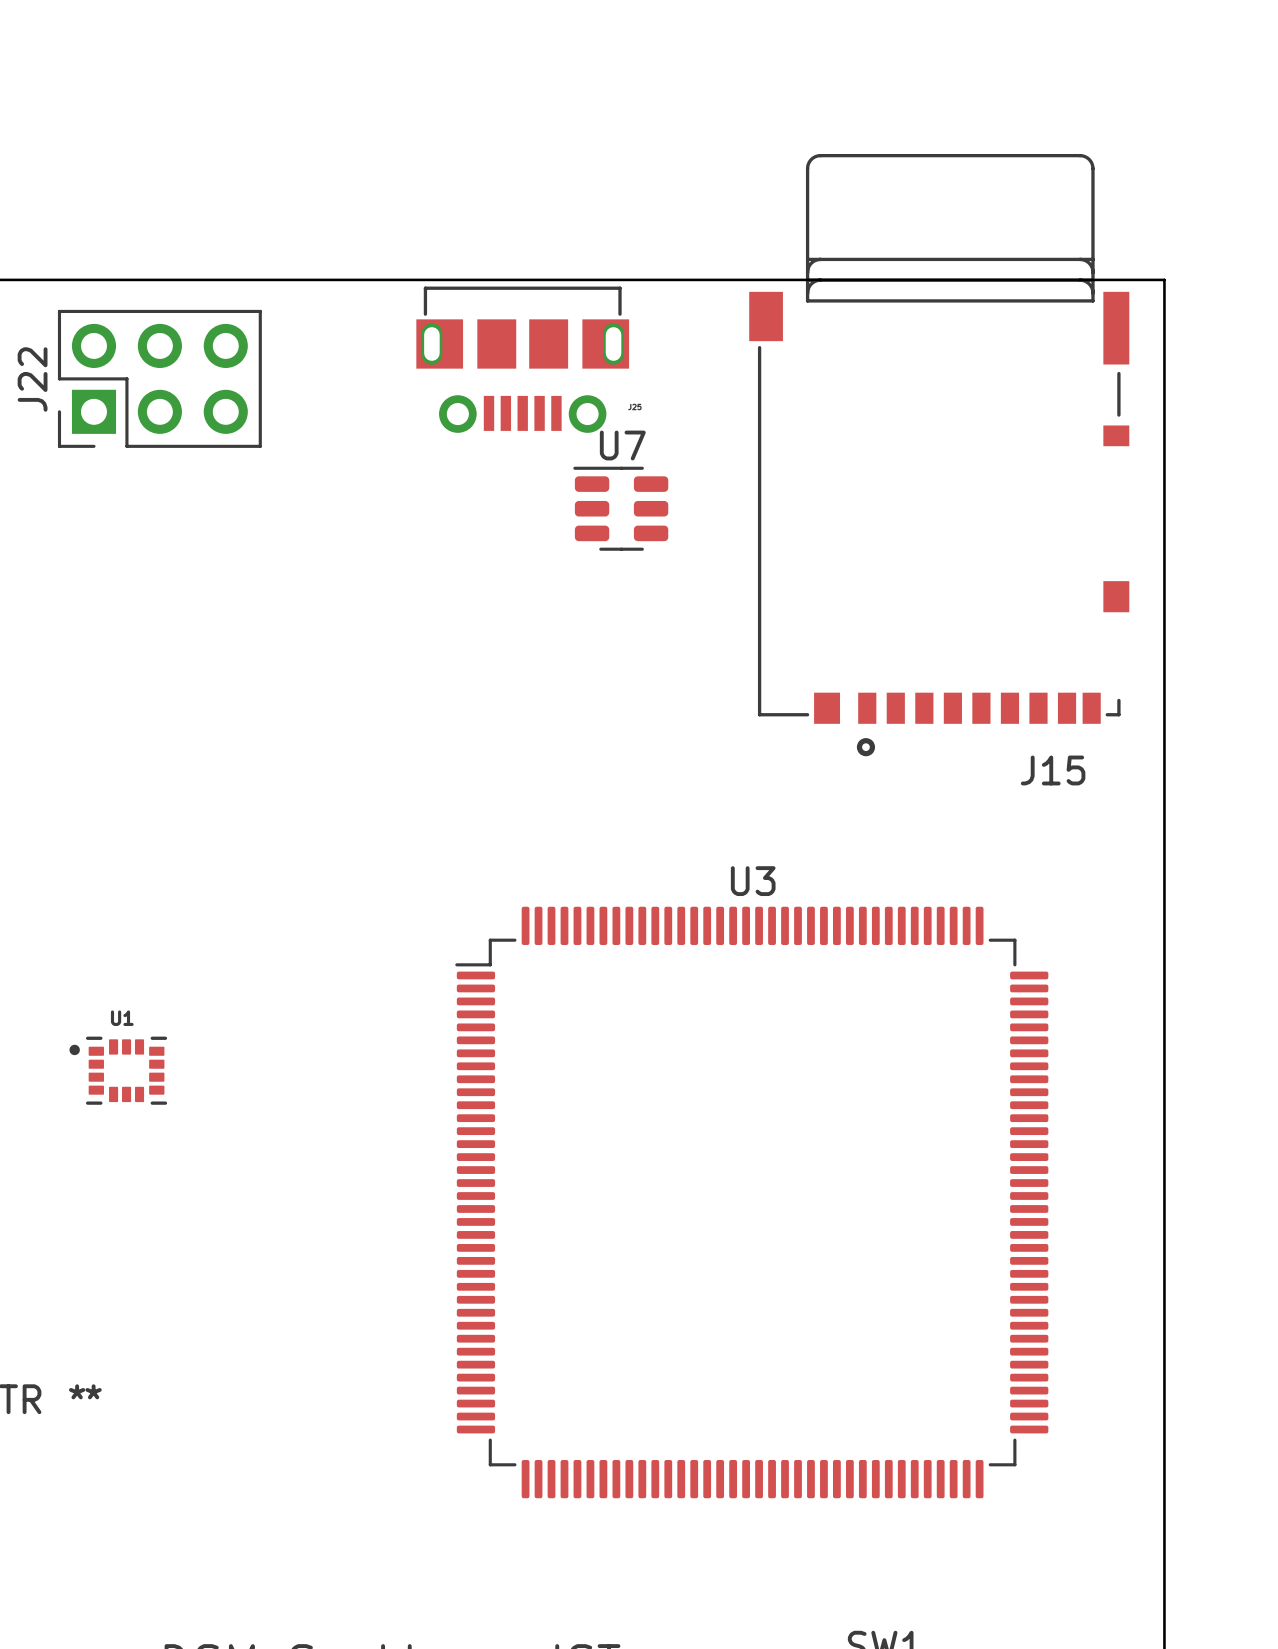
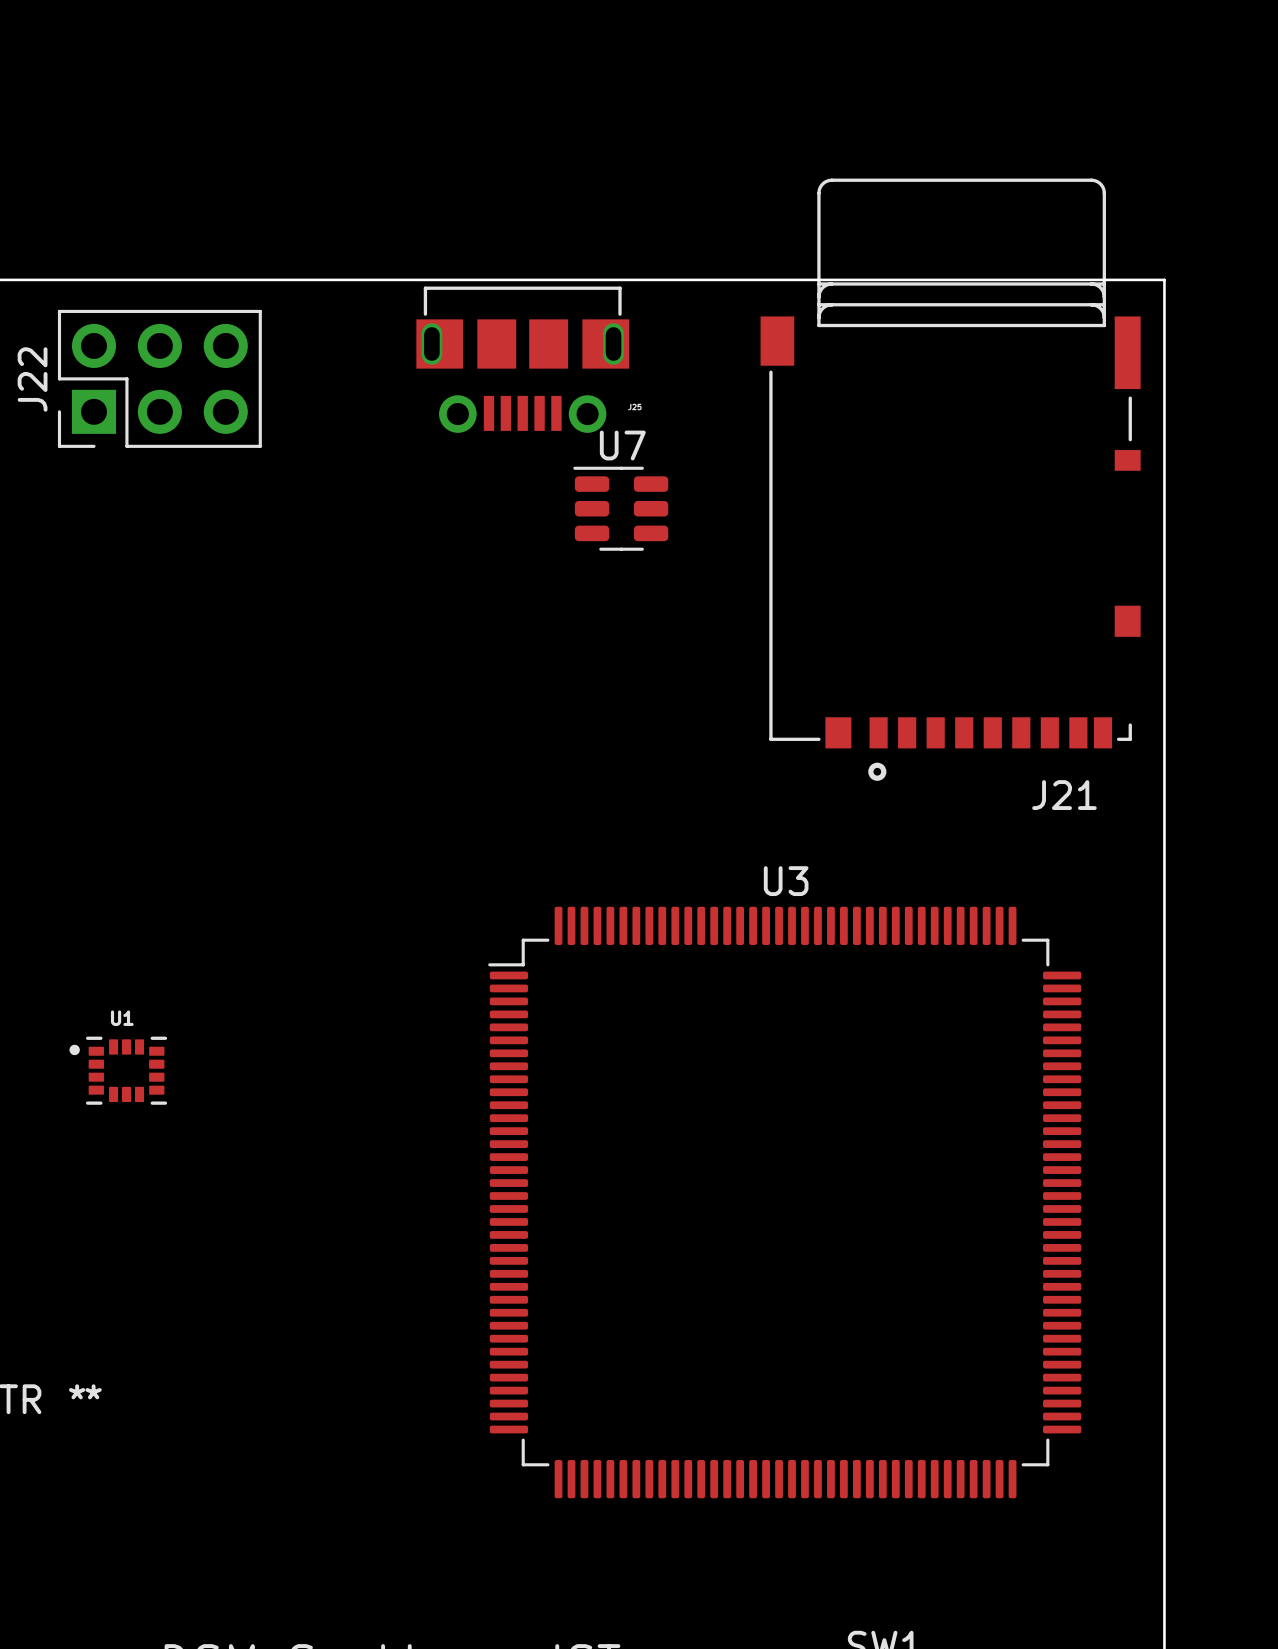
J15: (939, 455) -> none
J21: none -> (950, 479)
U3 position: (751, 1202) -> (784, 1202)

